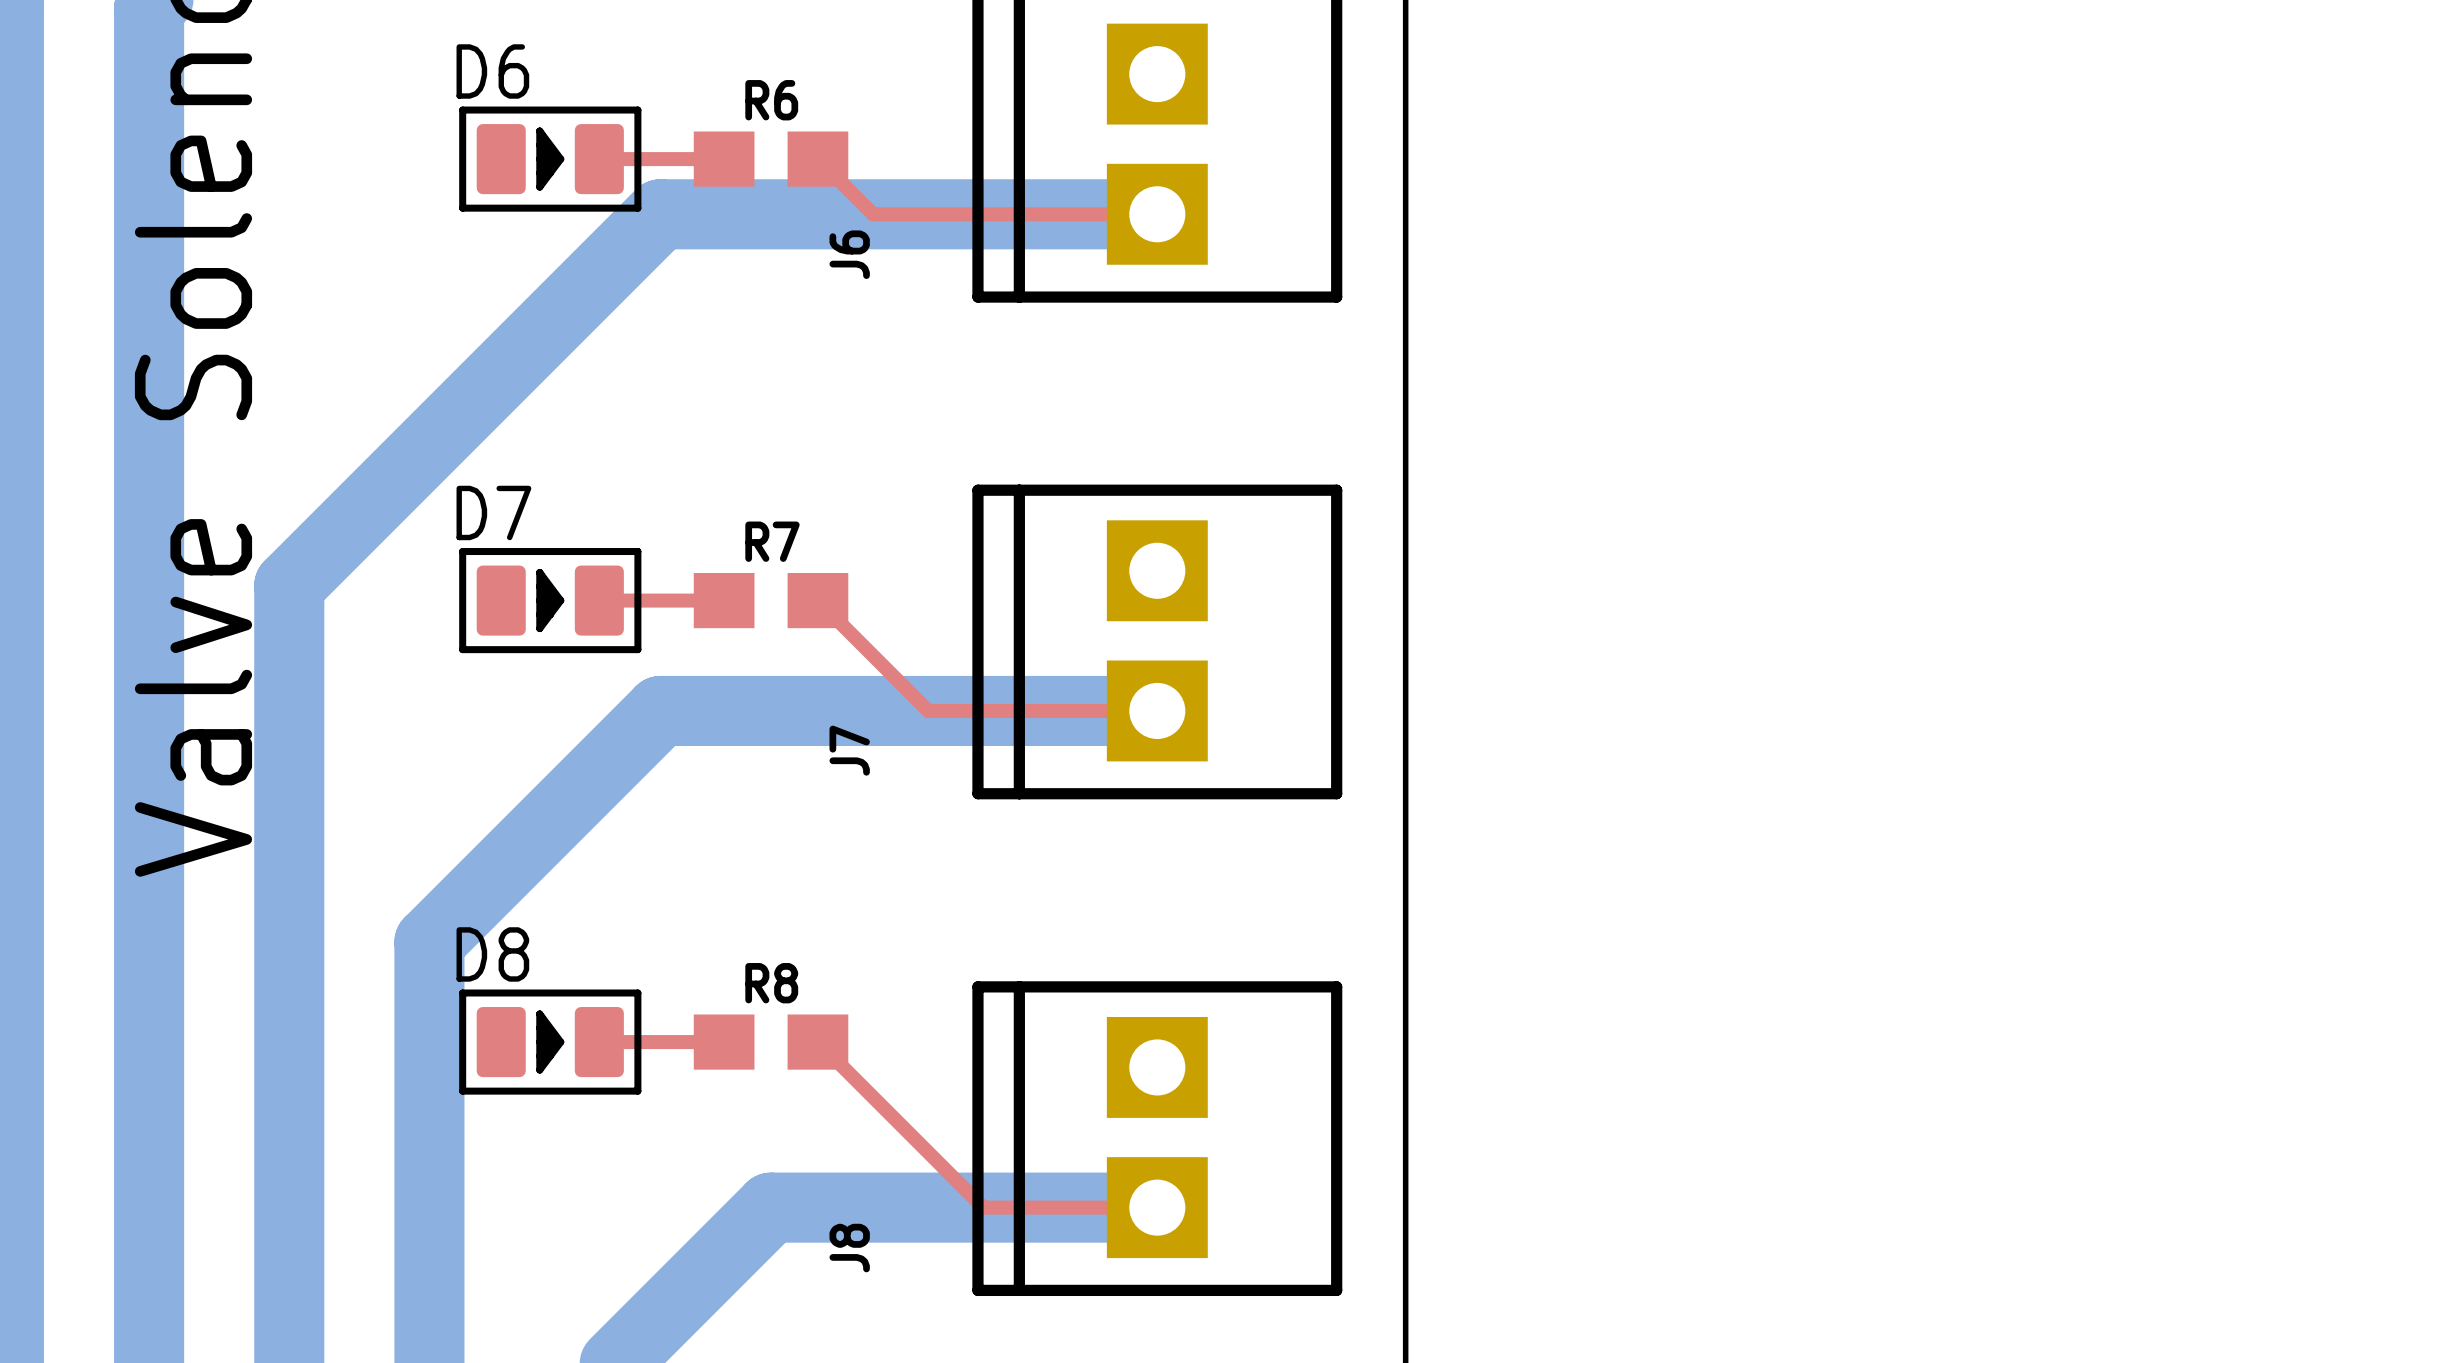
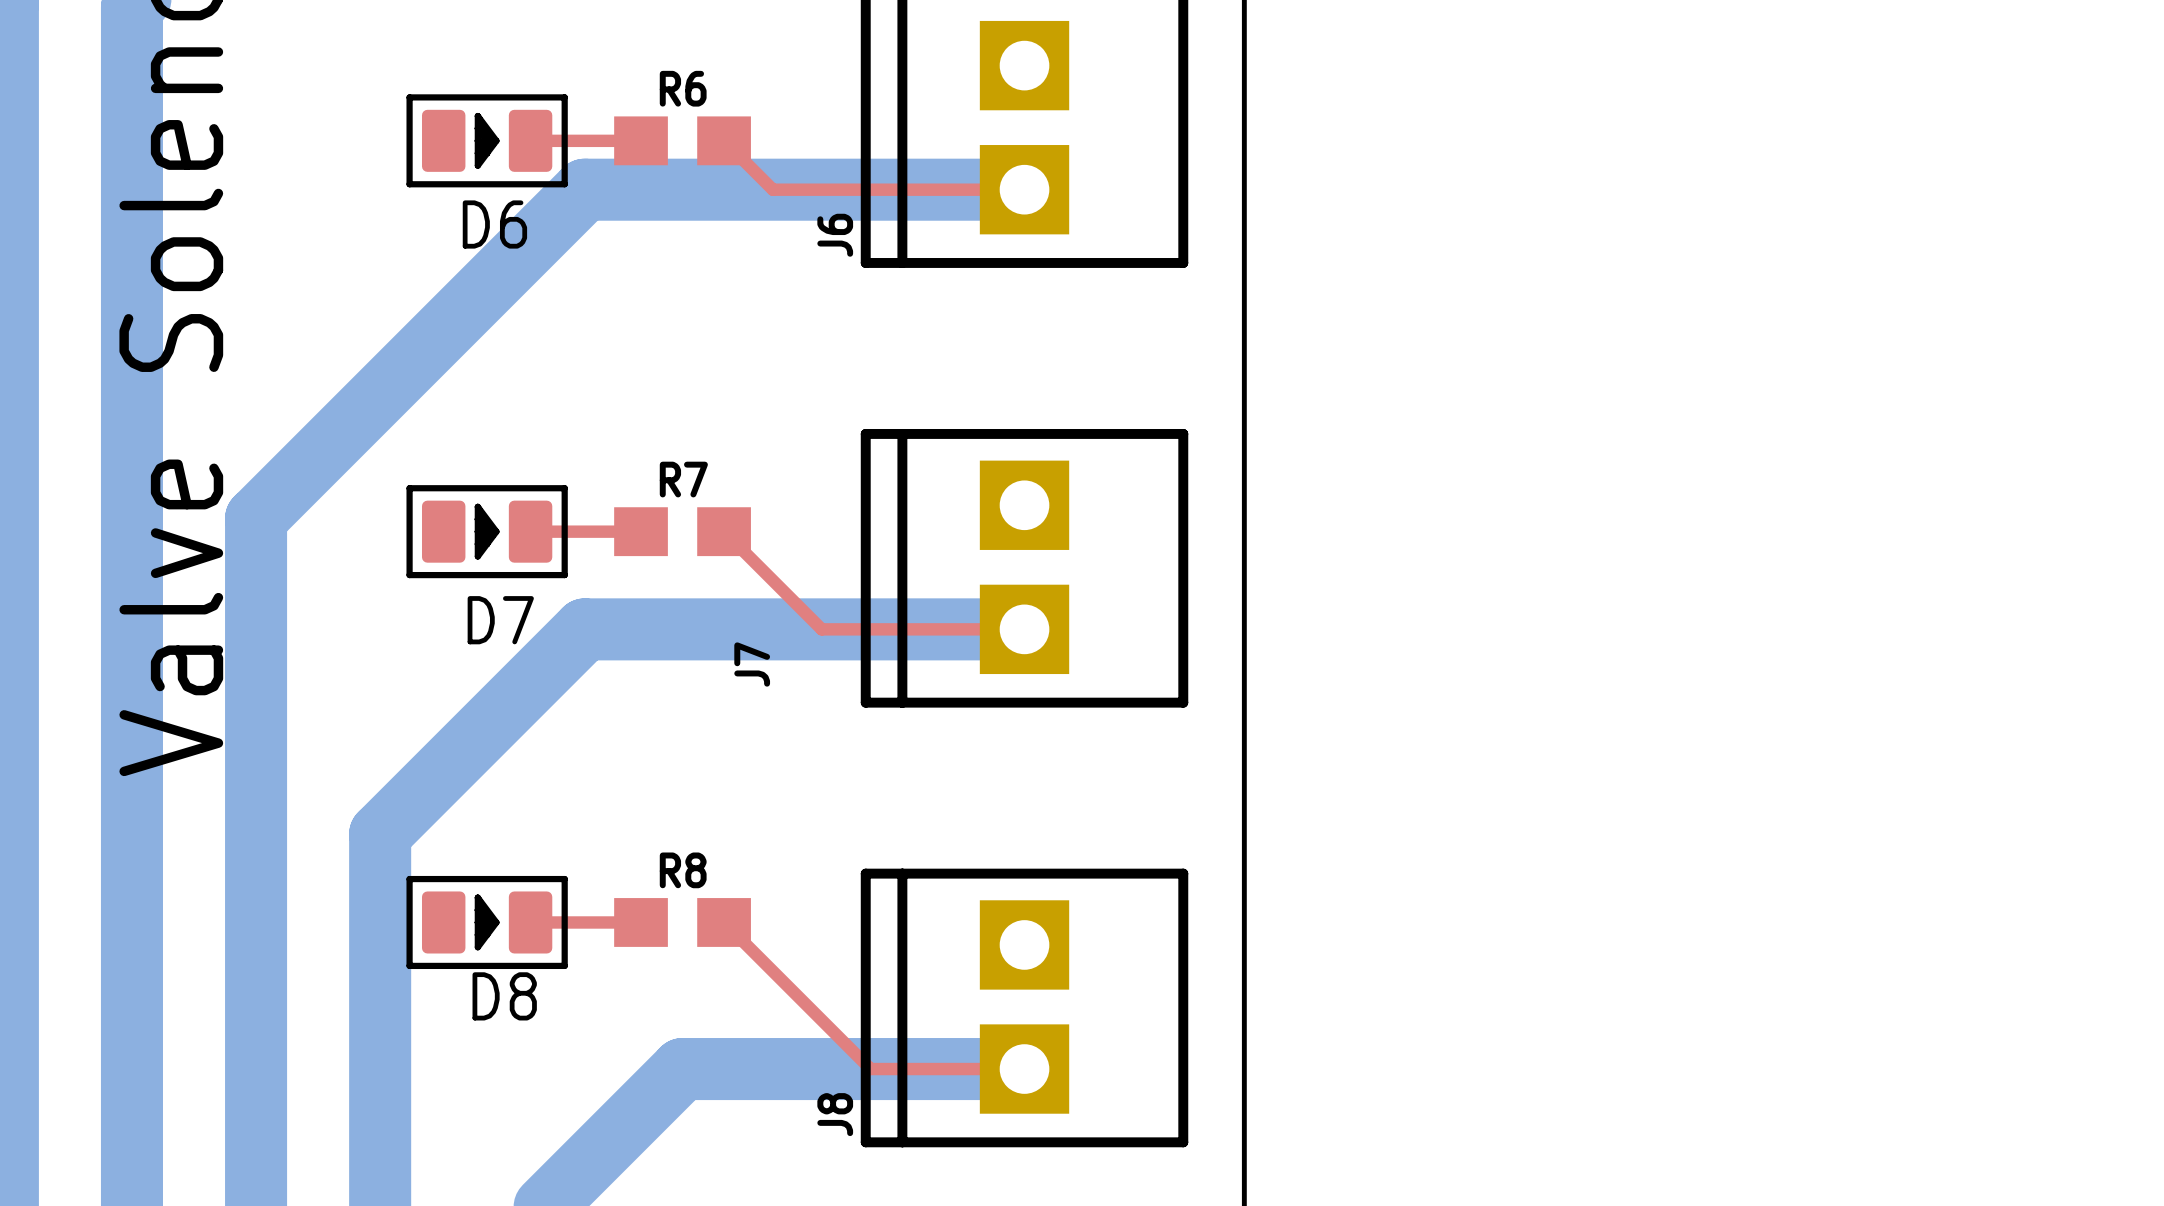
D6 name position: D6 (492, 71) -> D6 (494, 224)
J6 name position: J6 (849, 254) -> J6 (835, 235)
D7 name position: D7 (493, 512) -> D7 (500, 620)
D8 name position: D8 (492, 954) -> D8 (504, 996)
J8 name position: J8 (849, 1248) -> J8 (835, 1114)

